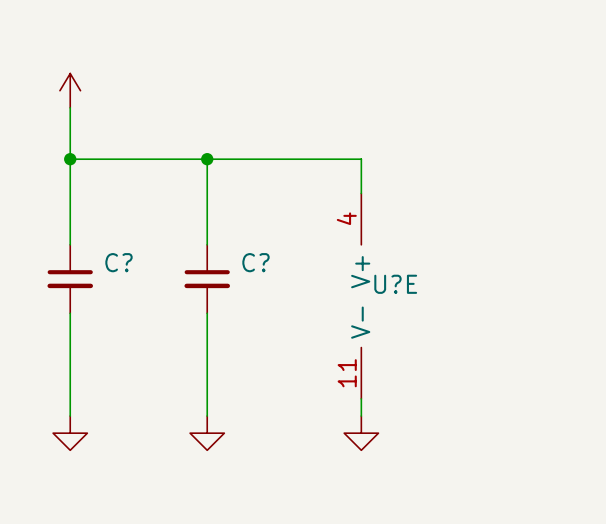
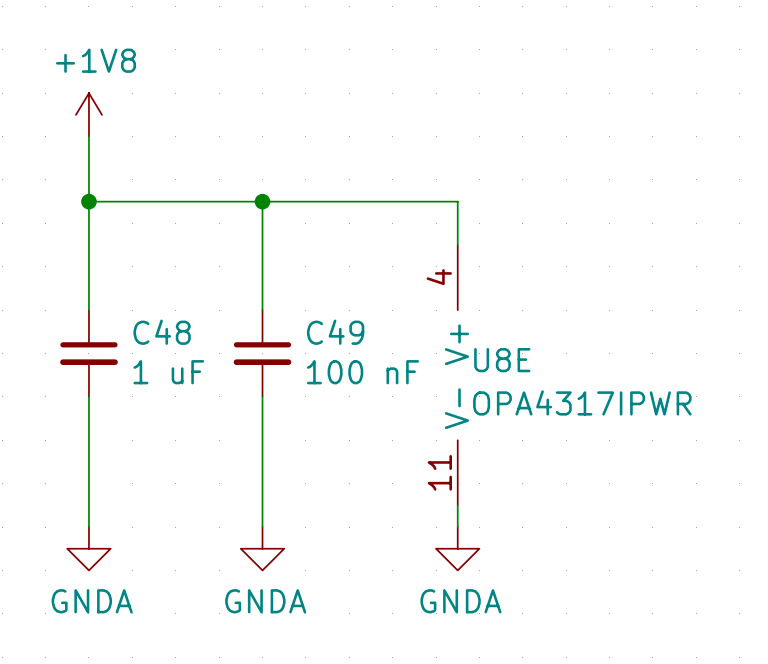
power symbol text: none -> +1V8 (95, 60)
C? name: C? (118, 262) -> C48 (162, 332)
C? name: C? (255, 262) -> C49 (335, 332)
U?E name: U?E (395, 284) -> U8E (502, 360)
C? value: none -> 1 uF (168, 372)
C? value: none -> 100 nF (363, 372)
U?E value: none -> OPA4317IPWR (582, 402)
power symbol text: none -> GNDA (92, 601)
power symbol text: none -> GNDA (265, 601)
power symbol text: none -> GNDA (460, 601)

